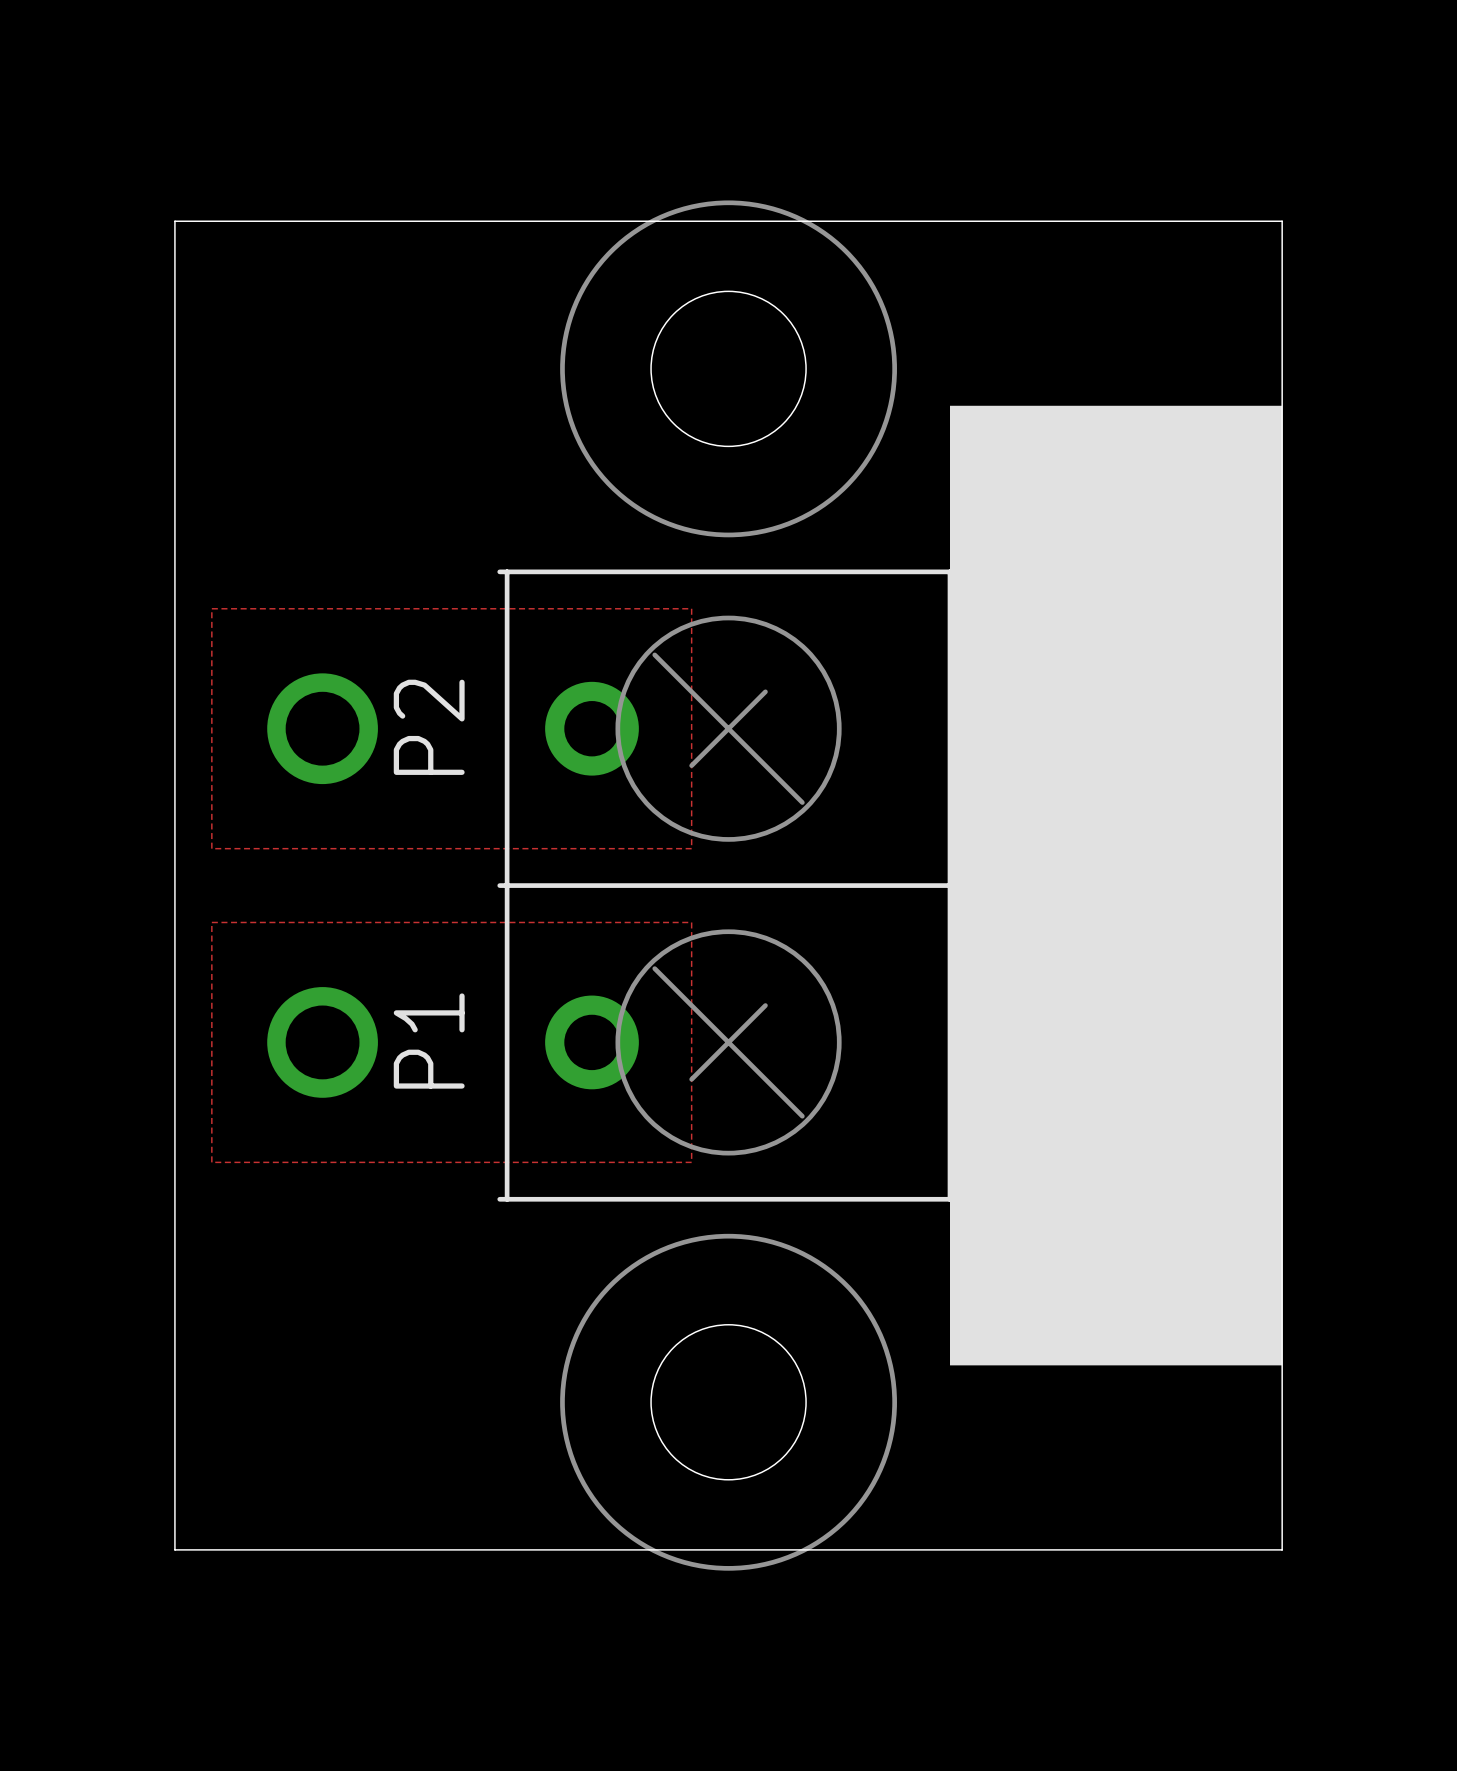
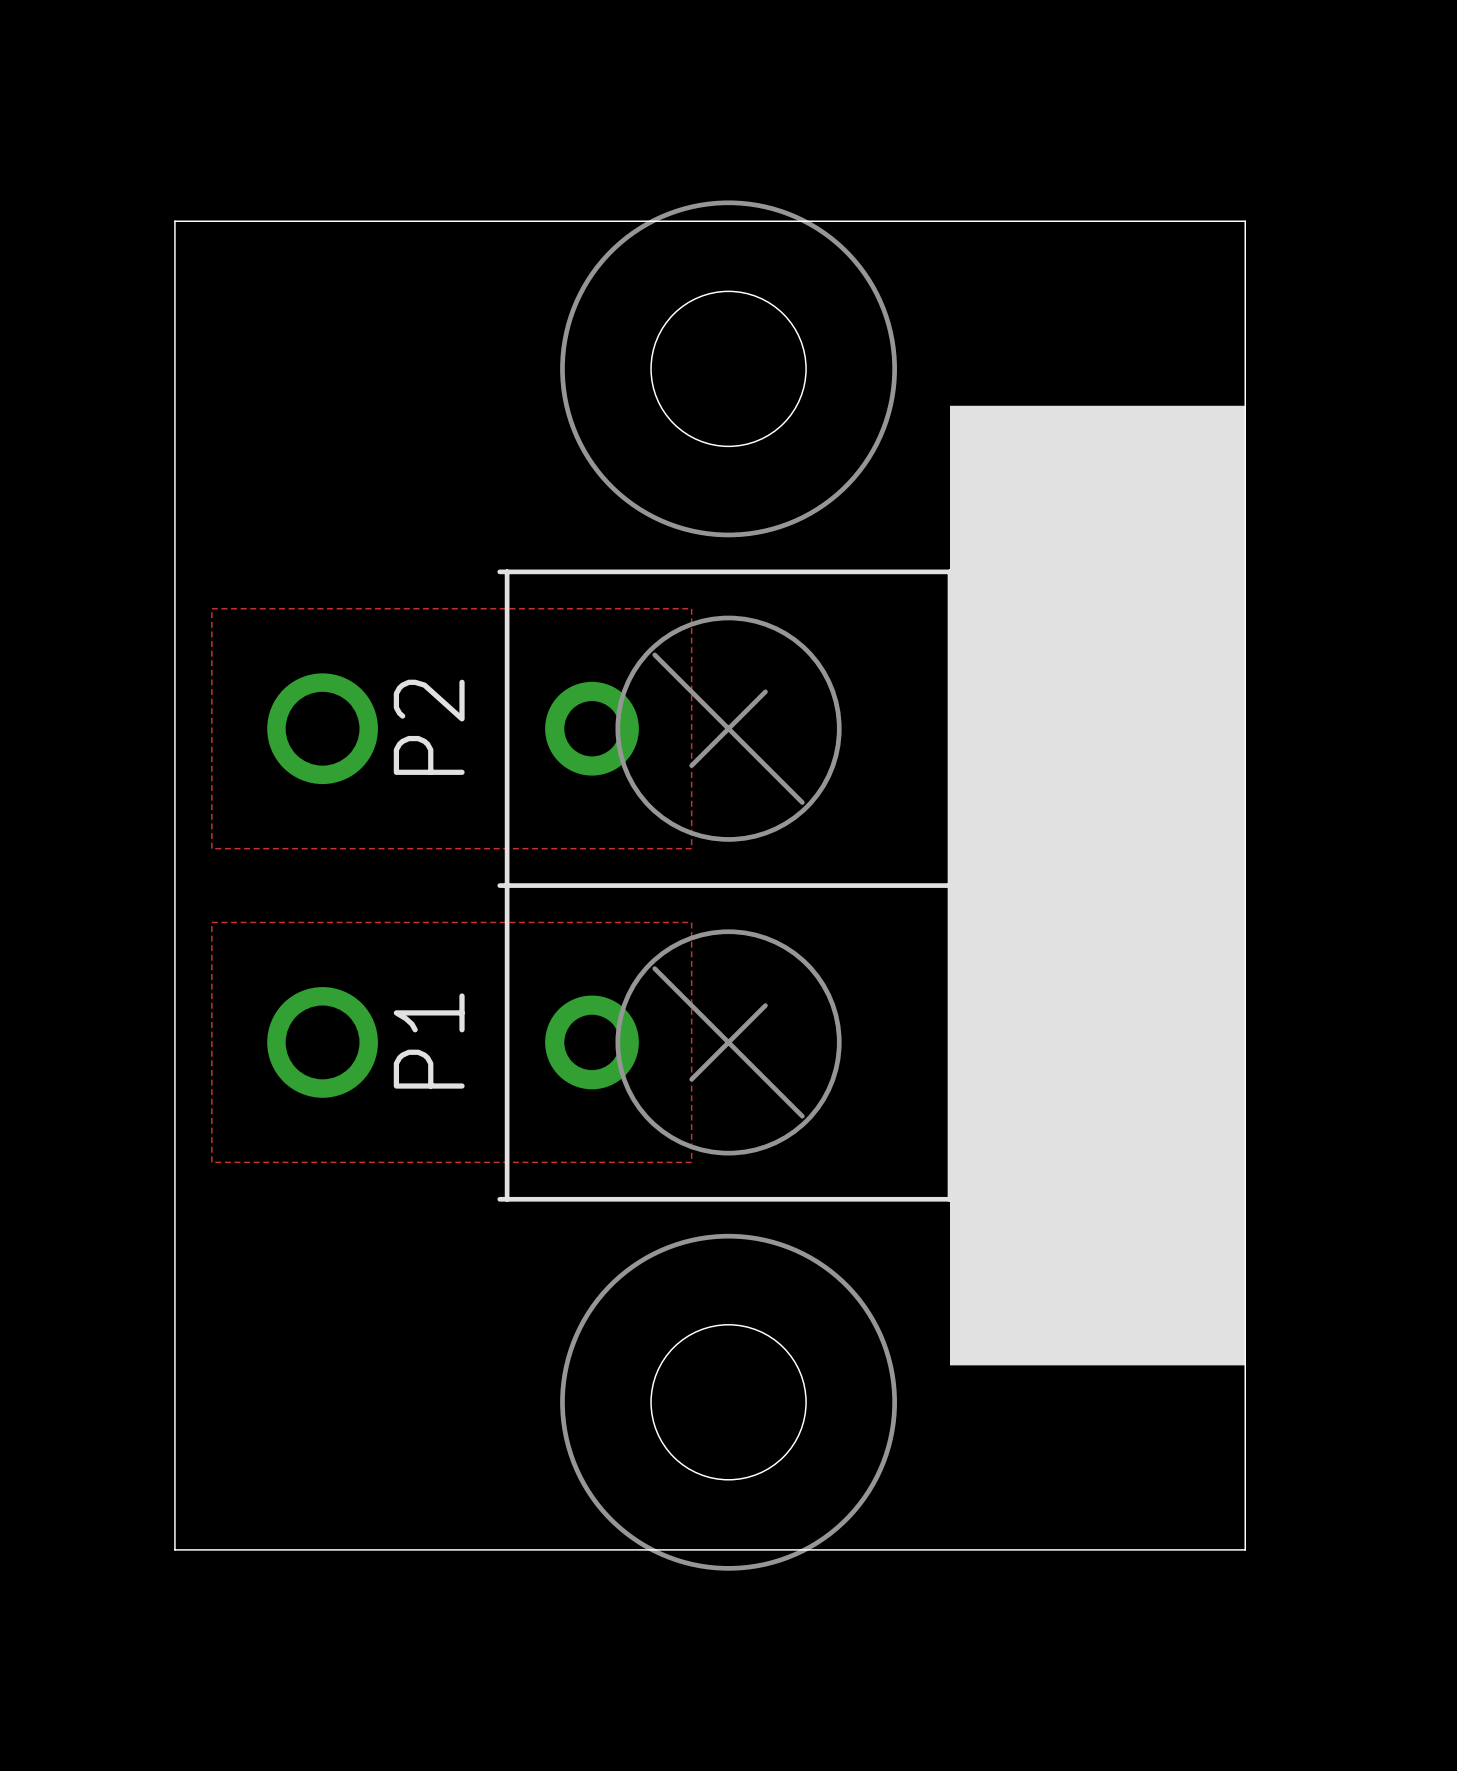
board edge: (1245, 221) (1282, 221) (1282, 1549) (1245, 1549) -> (1245, 221) (1245, 1549)
drawing shape: [949, 405, 1283, 1366] -> [949, 405, 1246, 1366]

